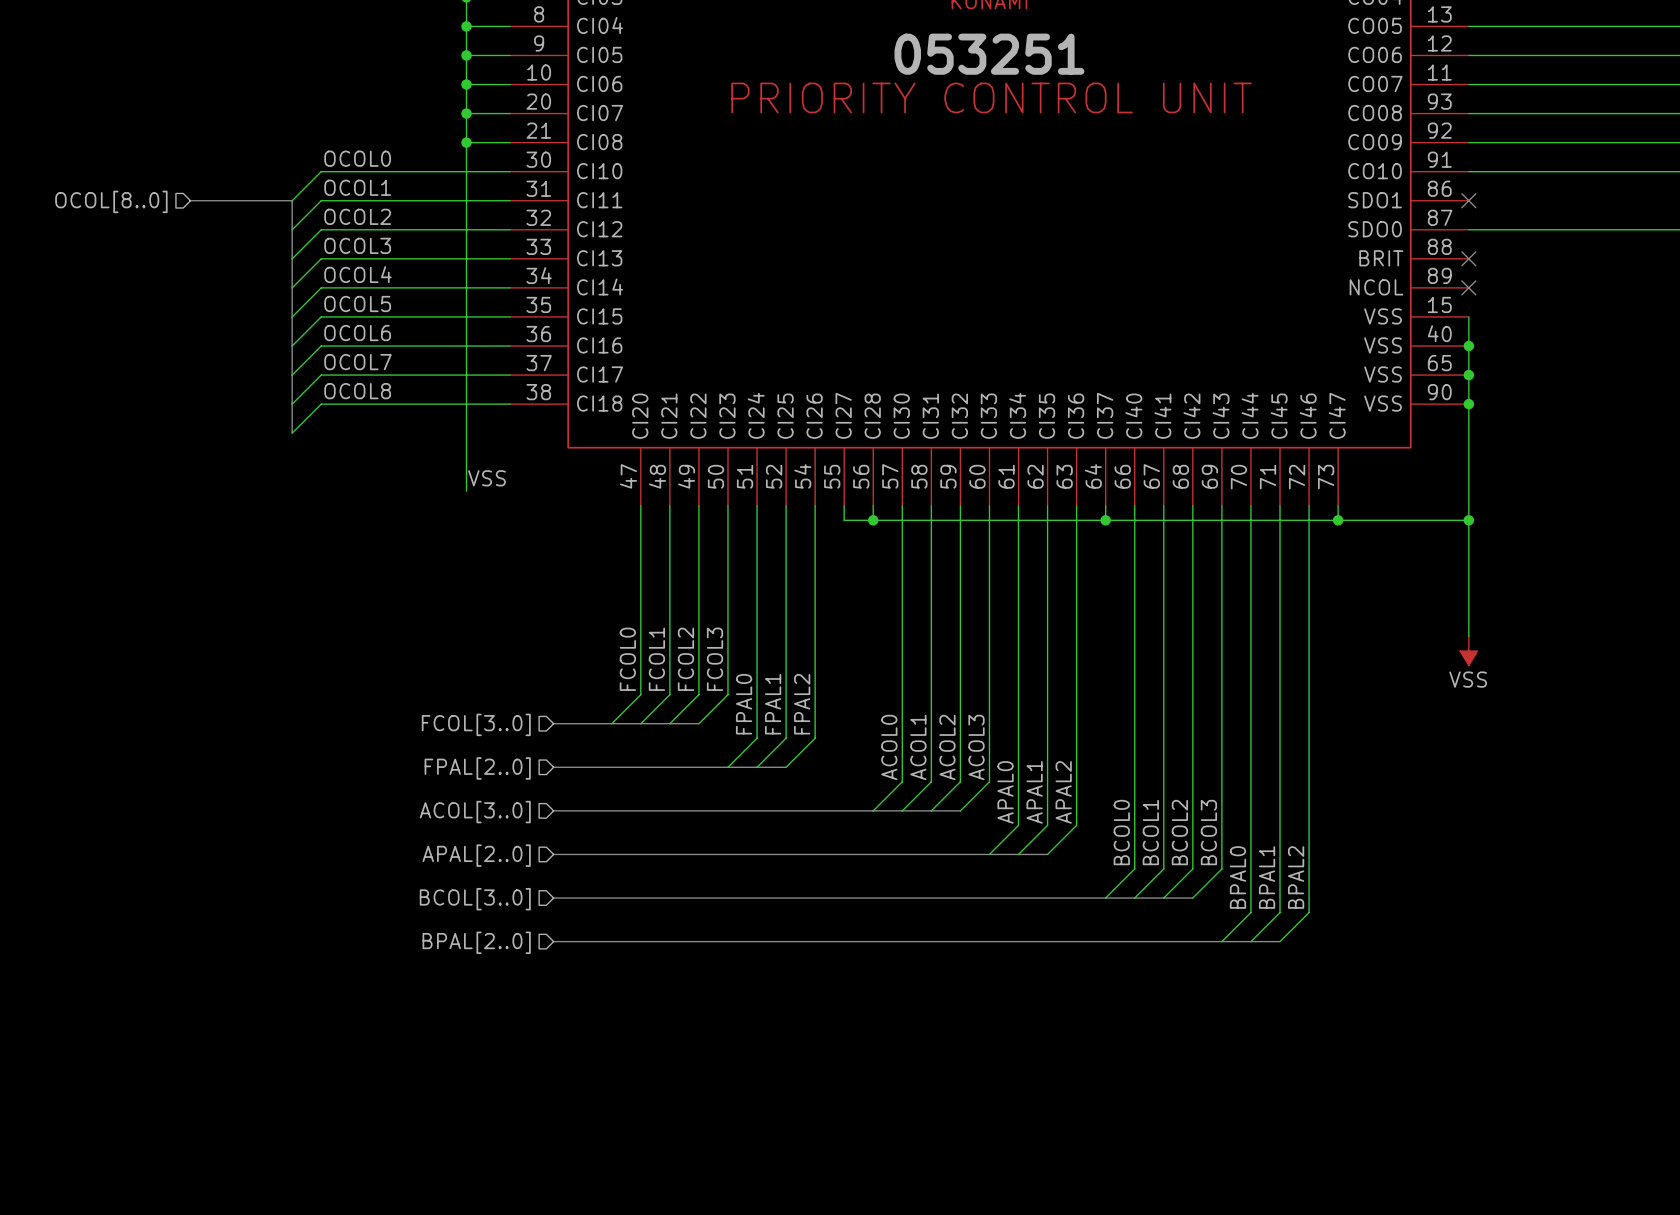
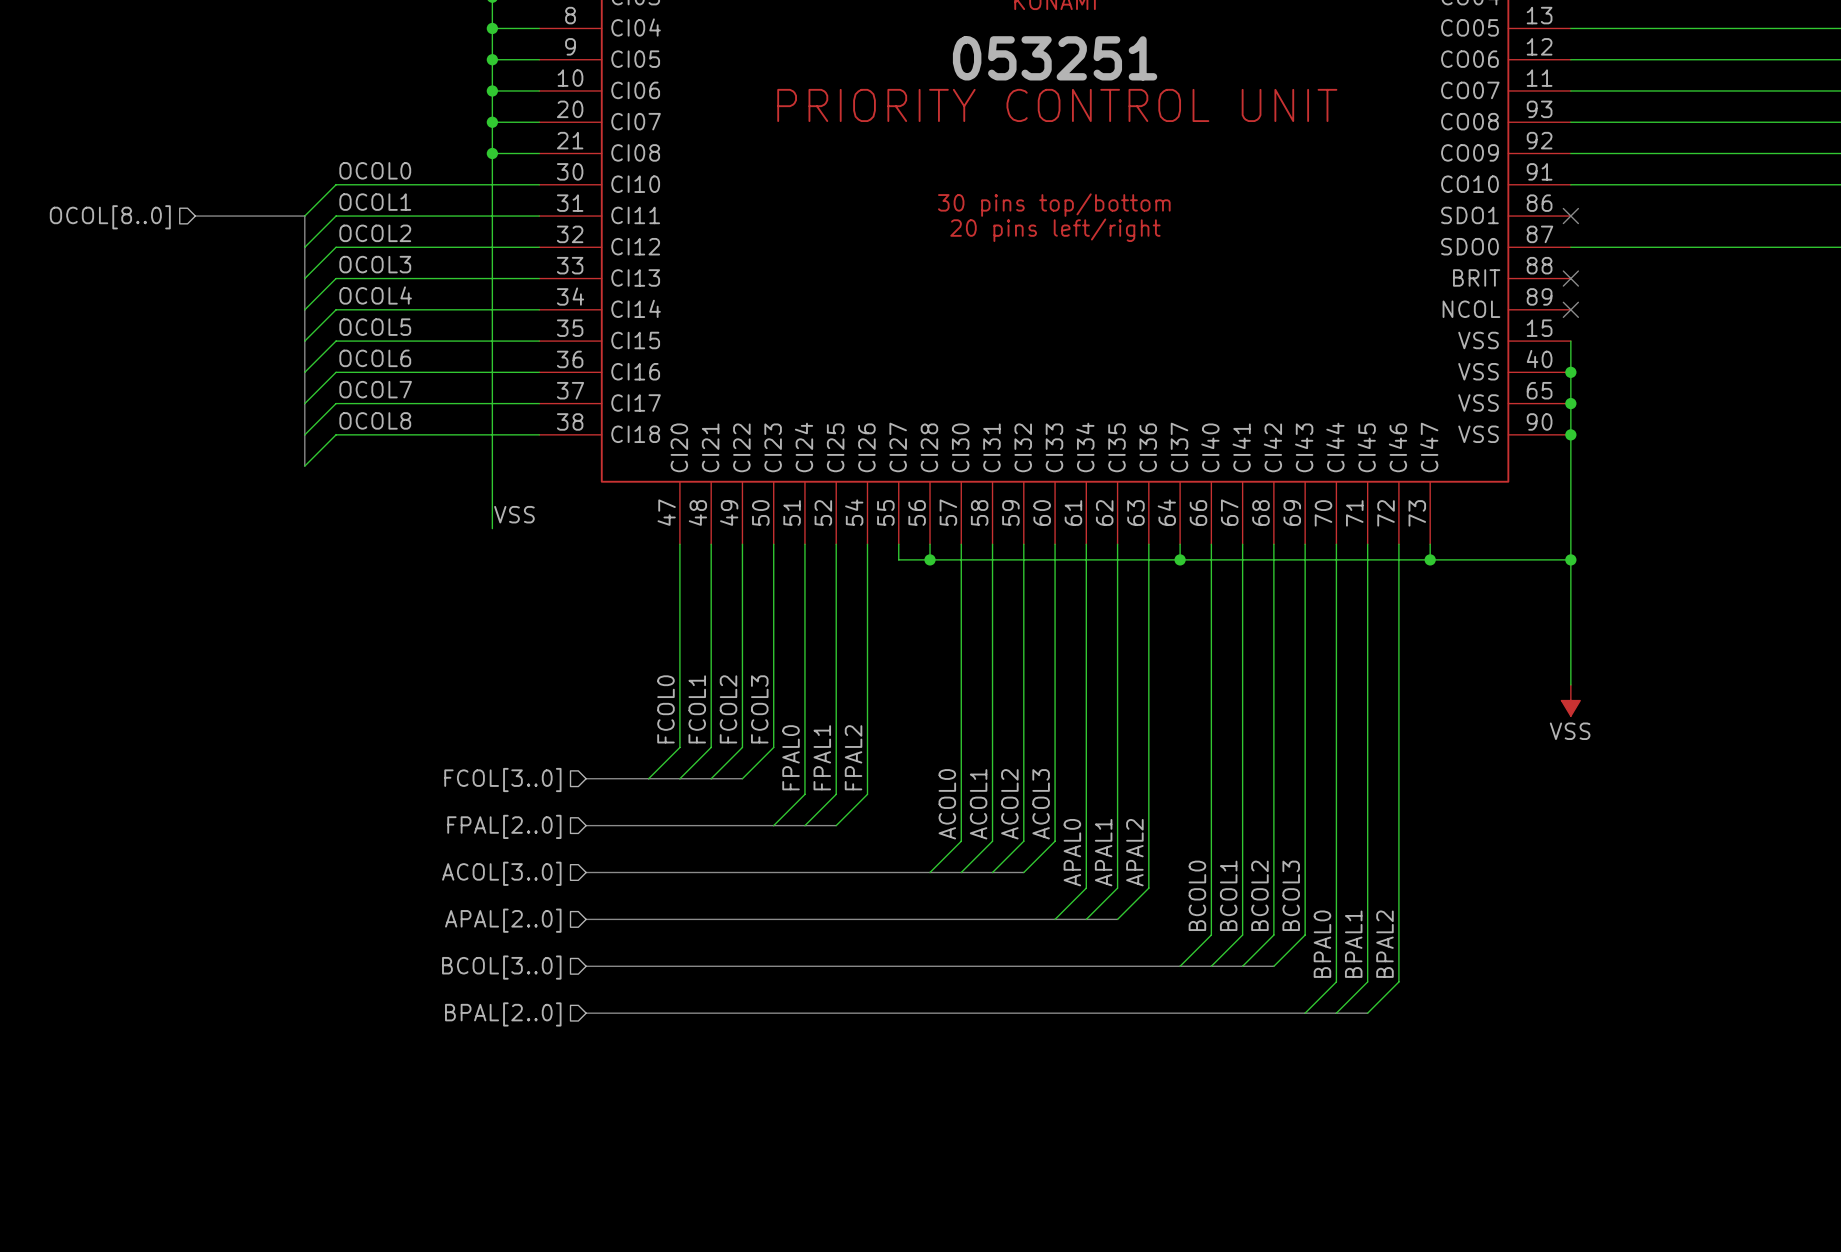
part text: none -> 30 pins top/bottom (1054, 205)
part text: none -> 20 pins left/right (1055, 230)

